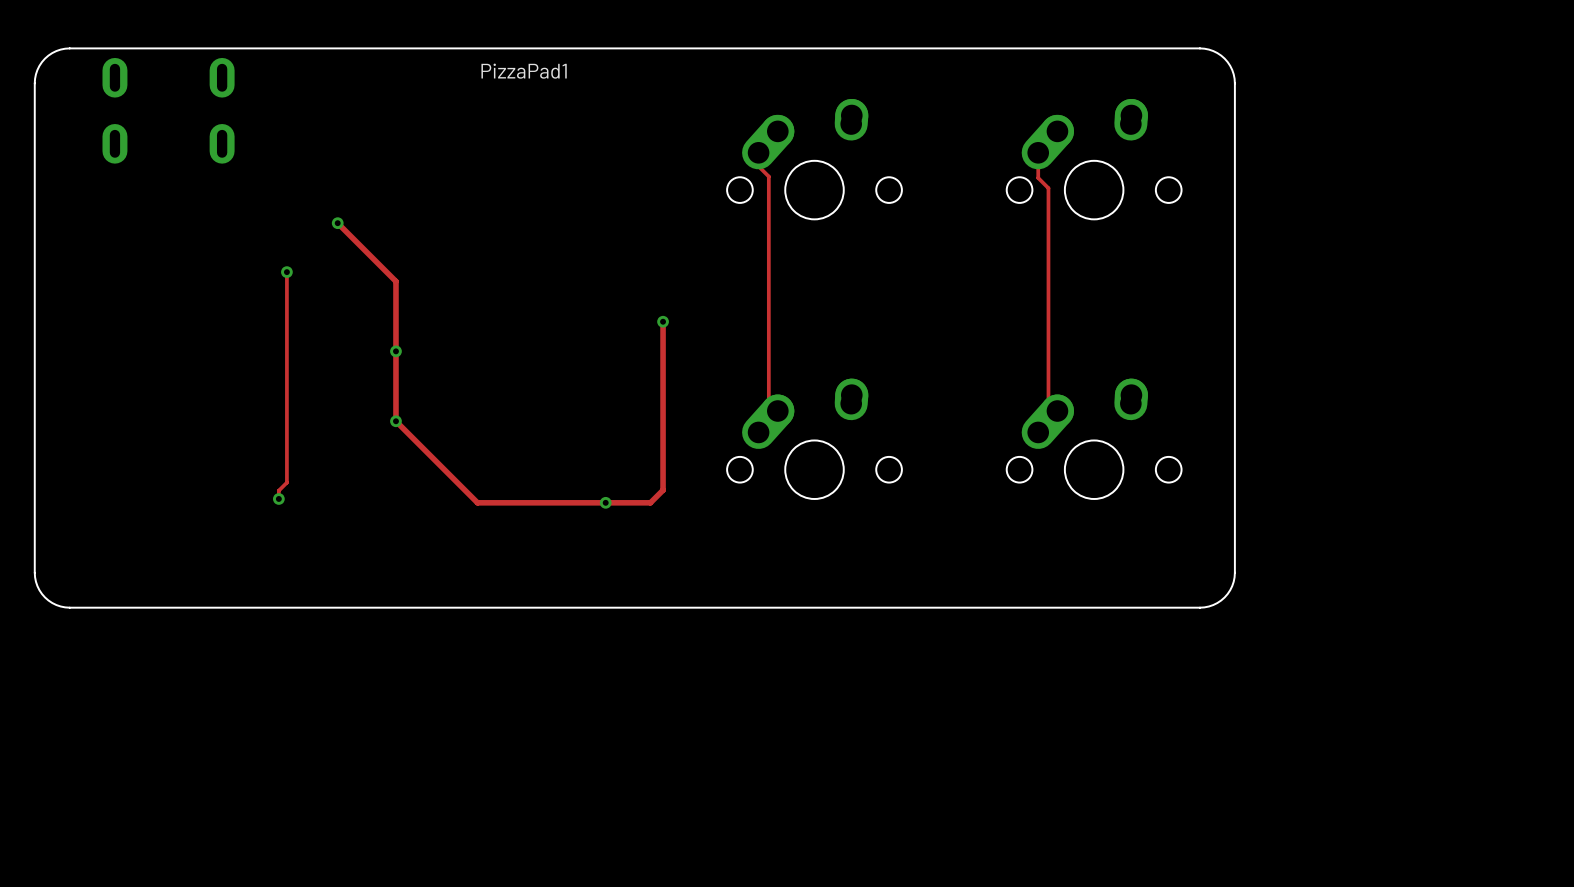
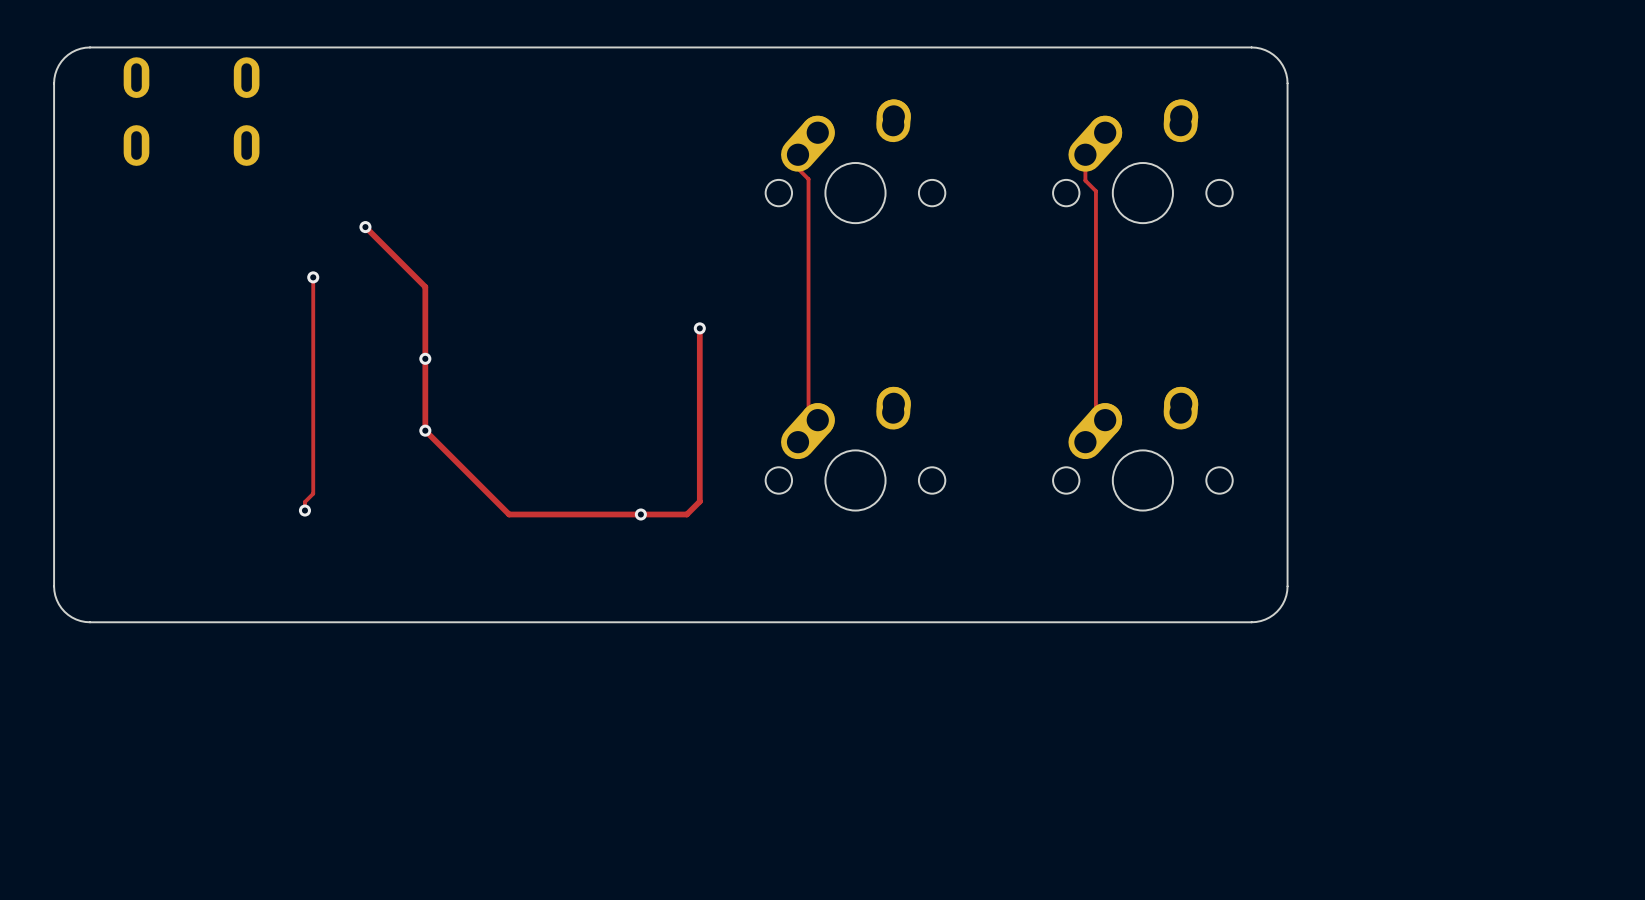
text: PizzaPad1 (524, 71) -> none

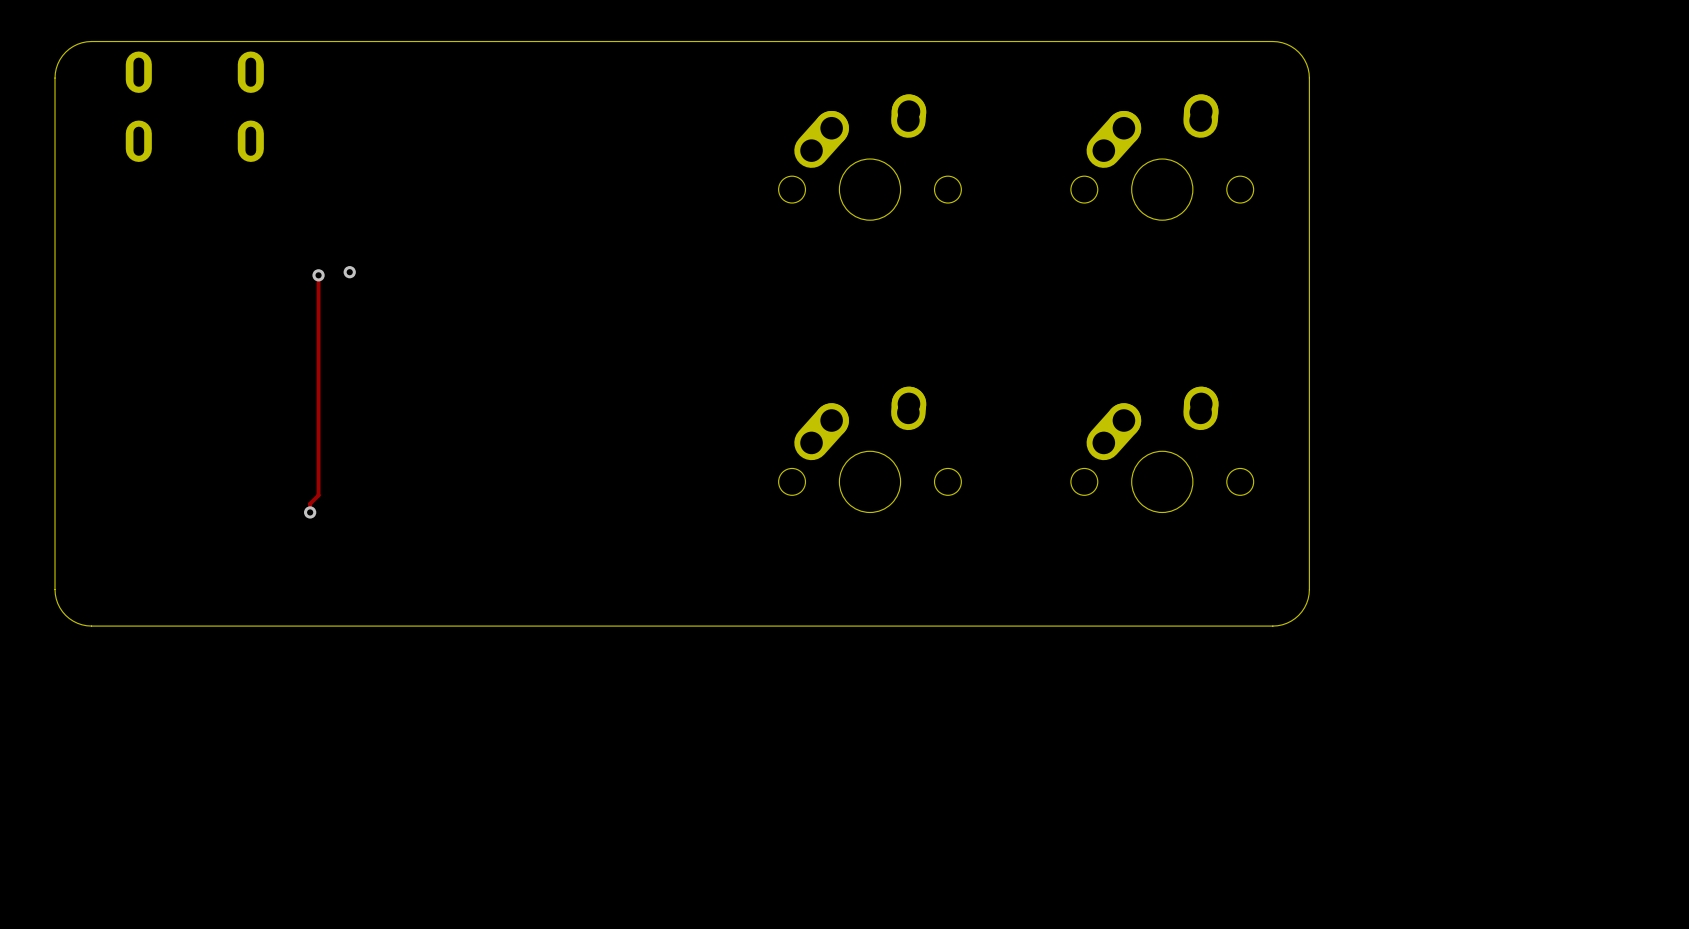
track: (798, 154) (798, 168) (808, 179) (808, 410) (817, 420) -> none
track: (1085, 154) (1085, 180) (1095, 191) (1095, 410) (1105, 420) -> none
track: (365, 227) (425, 286) (425, 430) (509, 514) (686, 514) (699, 501) (699, 328) -> none
via position: (365, 227) -> (349, 272)
via: (699, 328) -> none
via: (425, 358) -> none
via: (425, 430) -> none
via: (640, 514) -> none

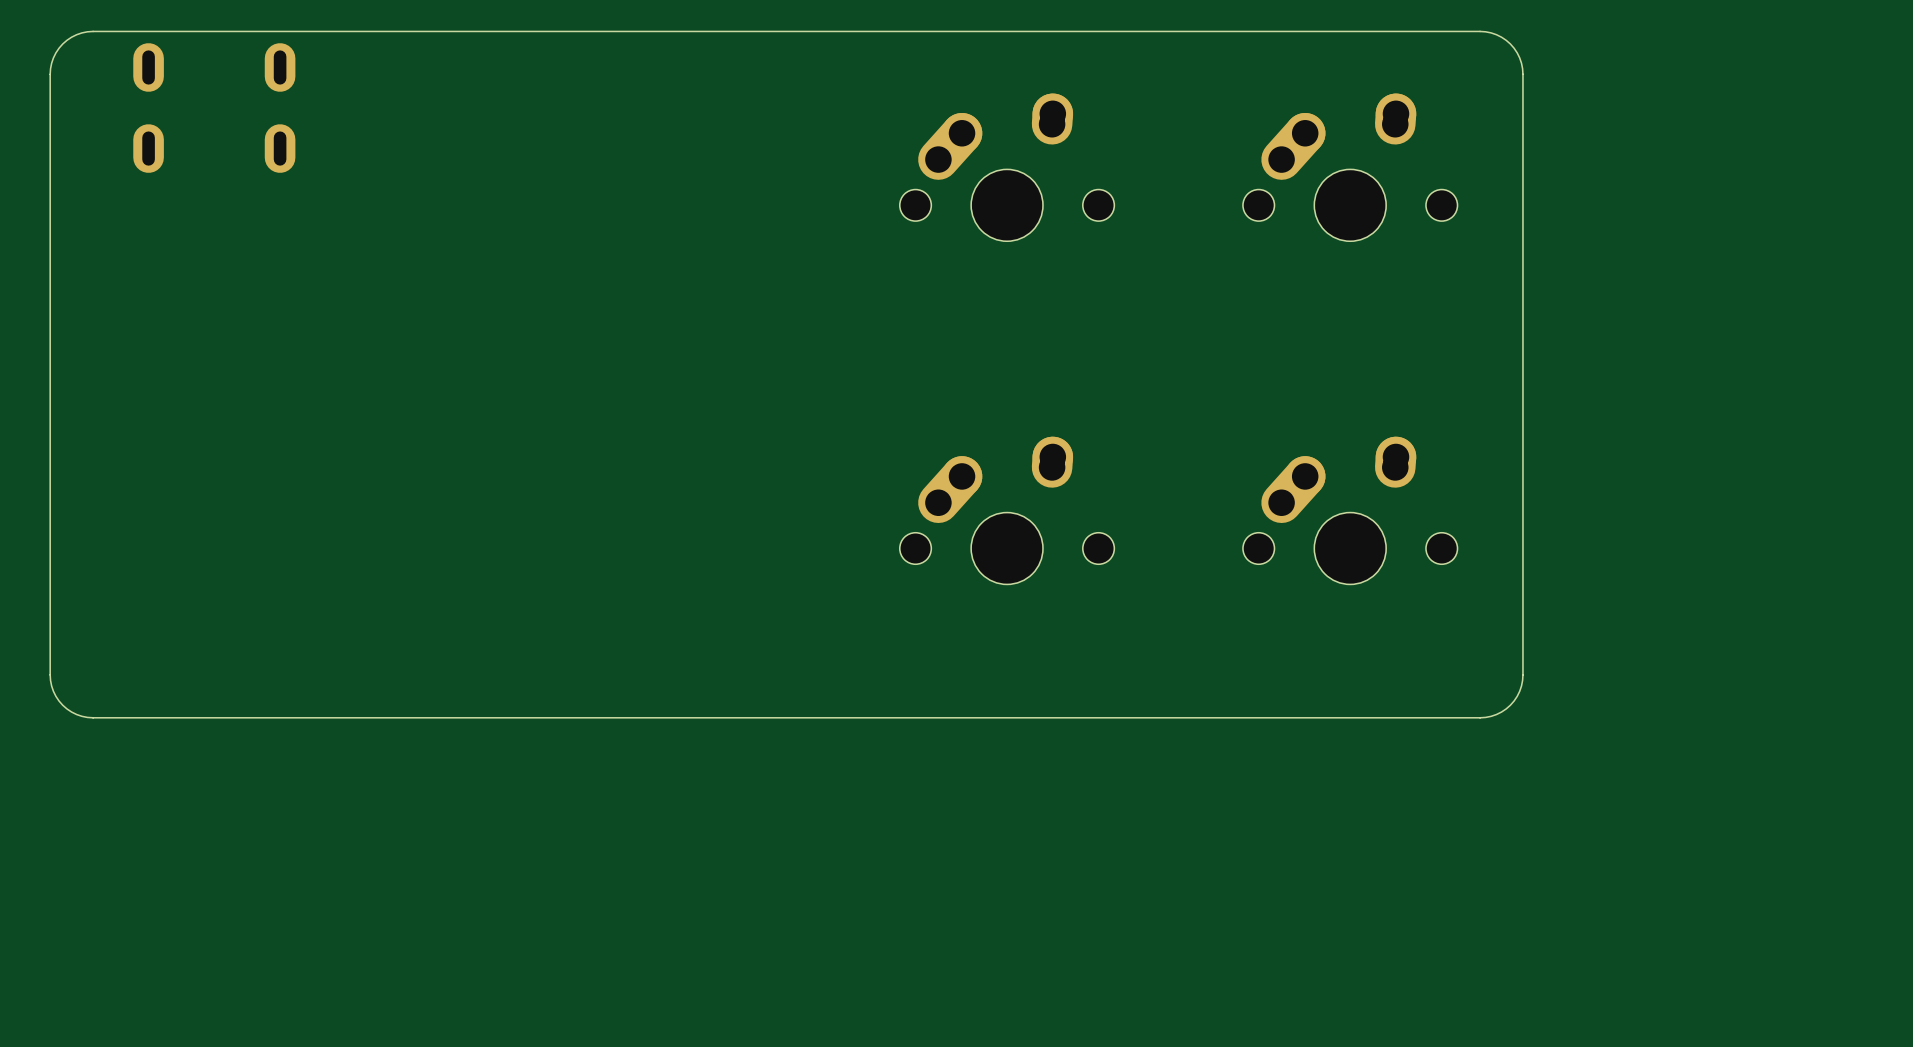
via: (349, 272) -> none
track: (318, 275) (318, 495) (310, 503) (310, 512) -> none
via: (318, 275) -> none
via: (310, 512) -> none

